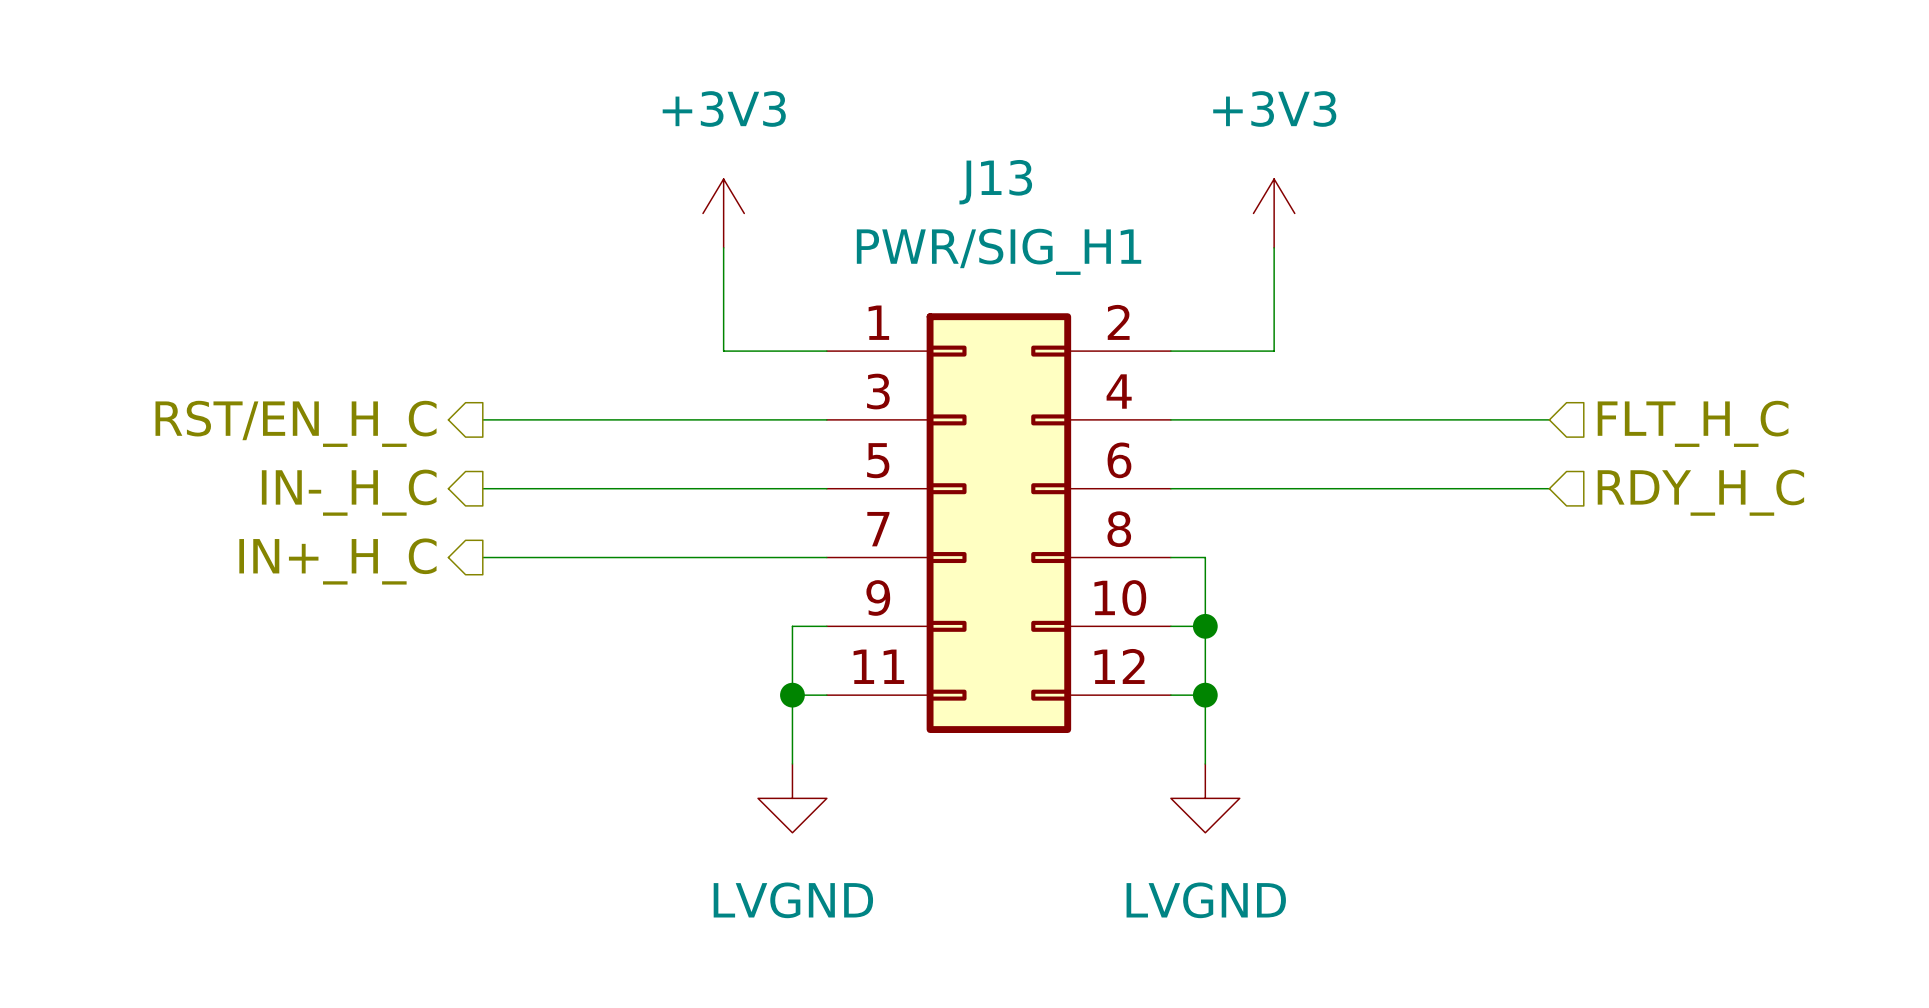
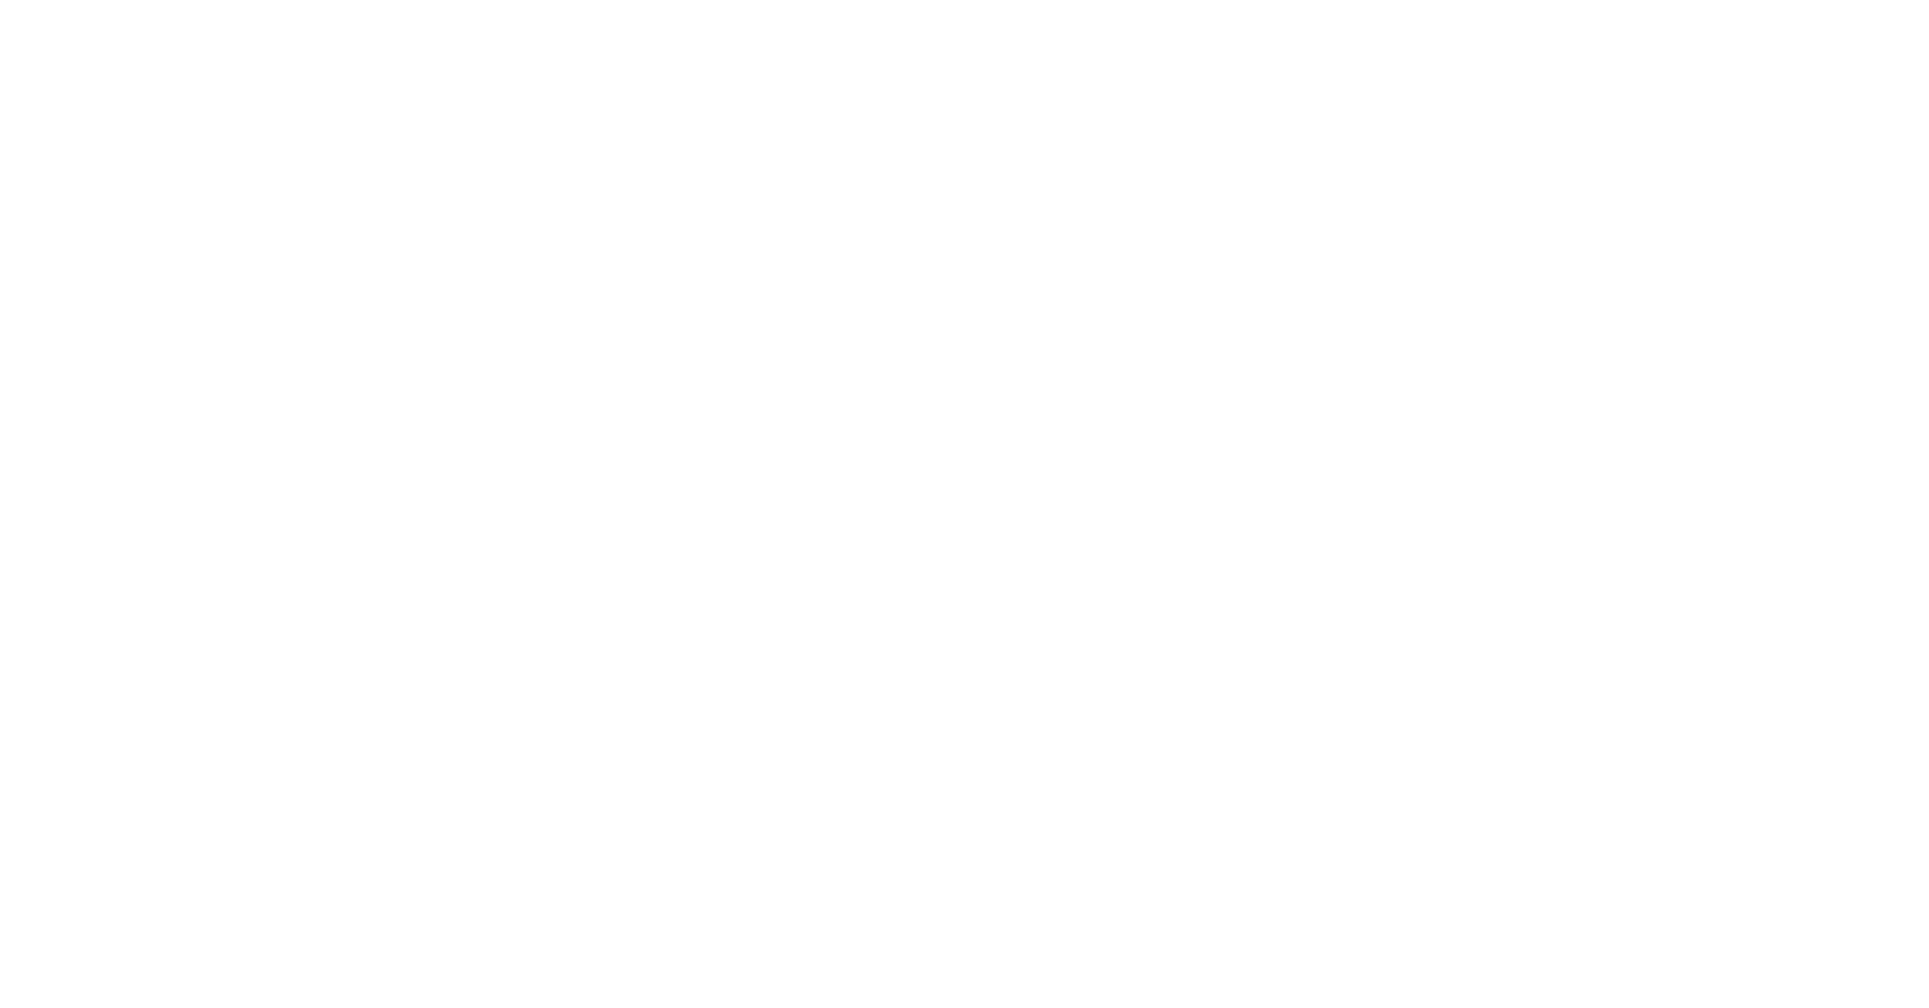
power symbol: +3V3 (723, 213) -> none
power symbol: +3V3 (1274, 213) -> none
wire: (723, 247) (723, 351) (826, 351) -> none
wire: (1274, 247) (1274, 351) (1170, 351) -> none
wire: (482, 419) (826, 419) -> none
wire: (1170, 419) (1549, 419) -> none
hierarchical label: RST/EN_H_C (296, 423) -> none
hierarchical label: FLT_H_C (1693, 423) -> none
wire: (482, 488) (826, 488) -> none
wire: (1170, 488) (1549, 488) -> none
hierarchical label: IN-_H_C (349, 492) -> none
hierarchical label: RDY_H_C (1700, 492) -> none
J13: PWR/SIG_H1 (998, 523) -> none
wire: (482, 557) (826, 557) -> none
wire: (1170, 557) (1205, 557) (1205, 763) -> none
hierarchical label: IN+_H_C (337, 561) -> none
wire: (826, 626) (792, 626) (792, 763) -> none
wire: (1170, 626) (1205, 626) -> none
junction: (1205, 626) -> none
wire: (792, 695) (826, 695) -> none
junction: (792, 695) -> none
wire: (1170, 695) (1205, 695) -> none
junction: (1205, 695) -> none
power symbol: LVGND (792, 798) -> none
power symbol: LVGND (1205, 798) -> none

